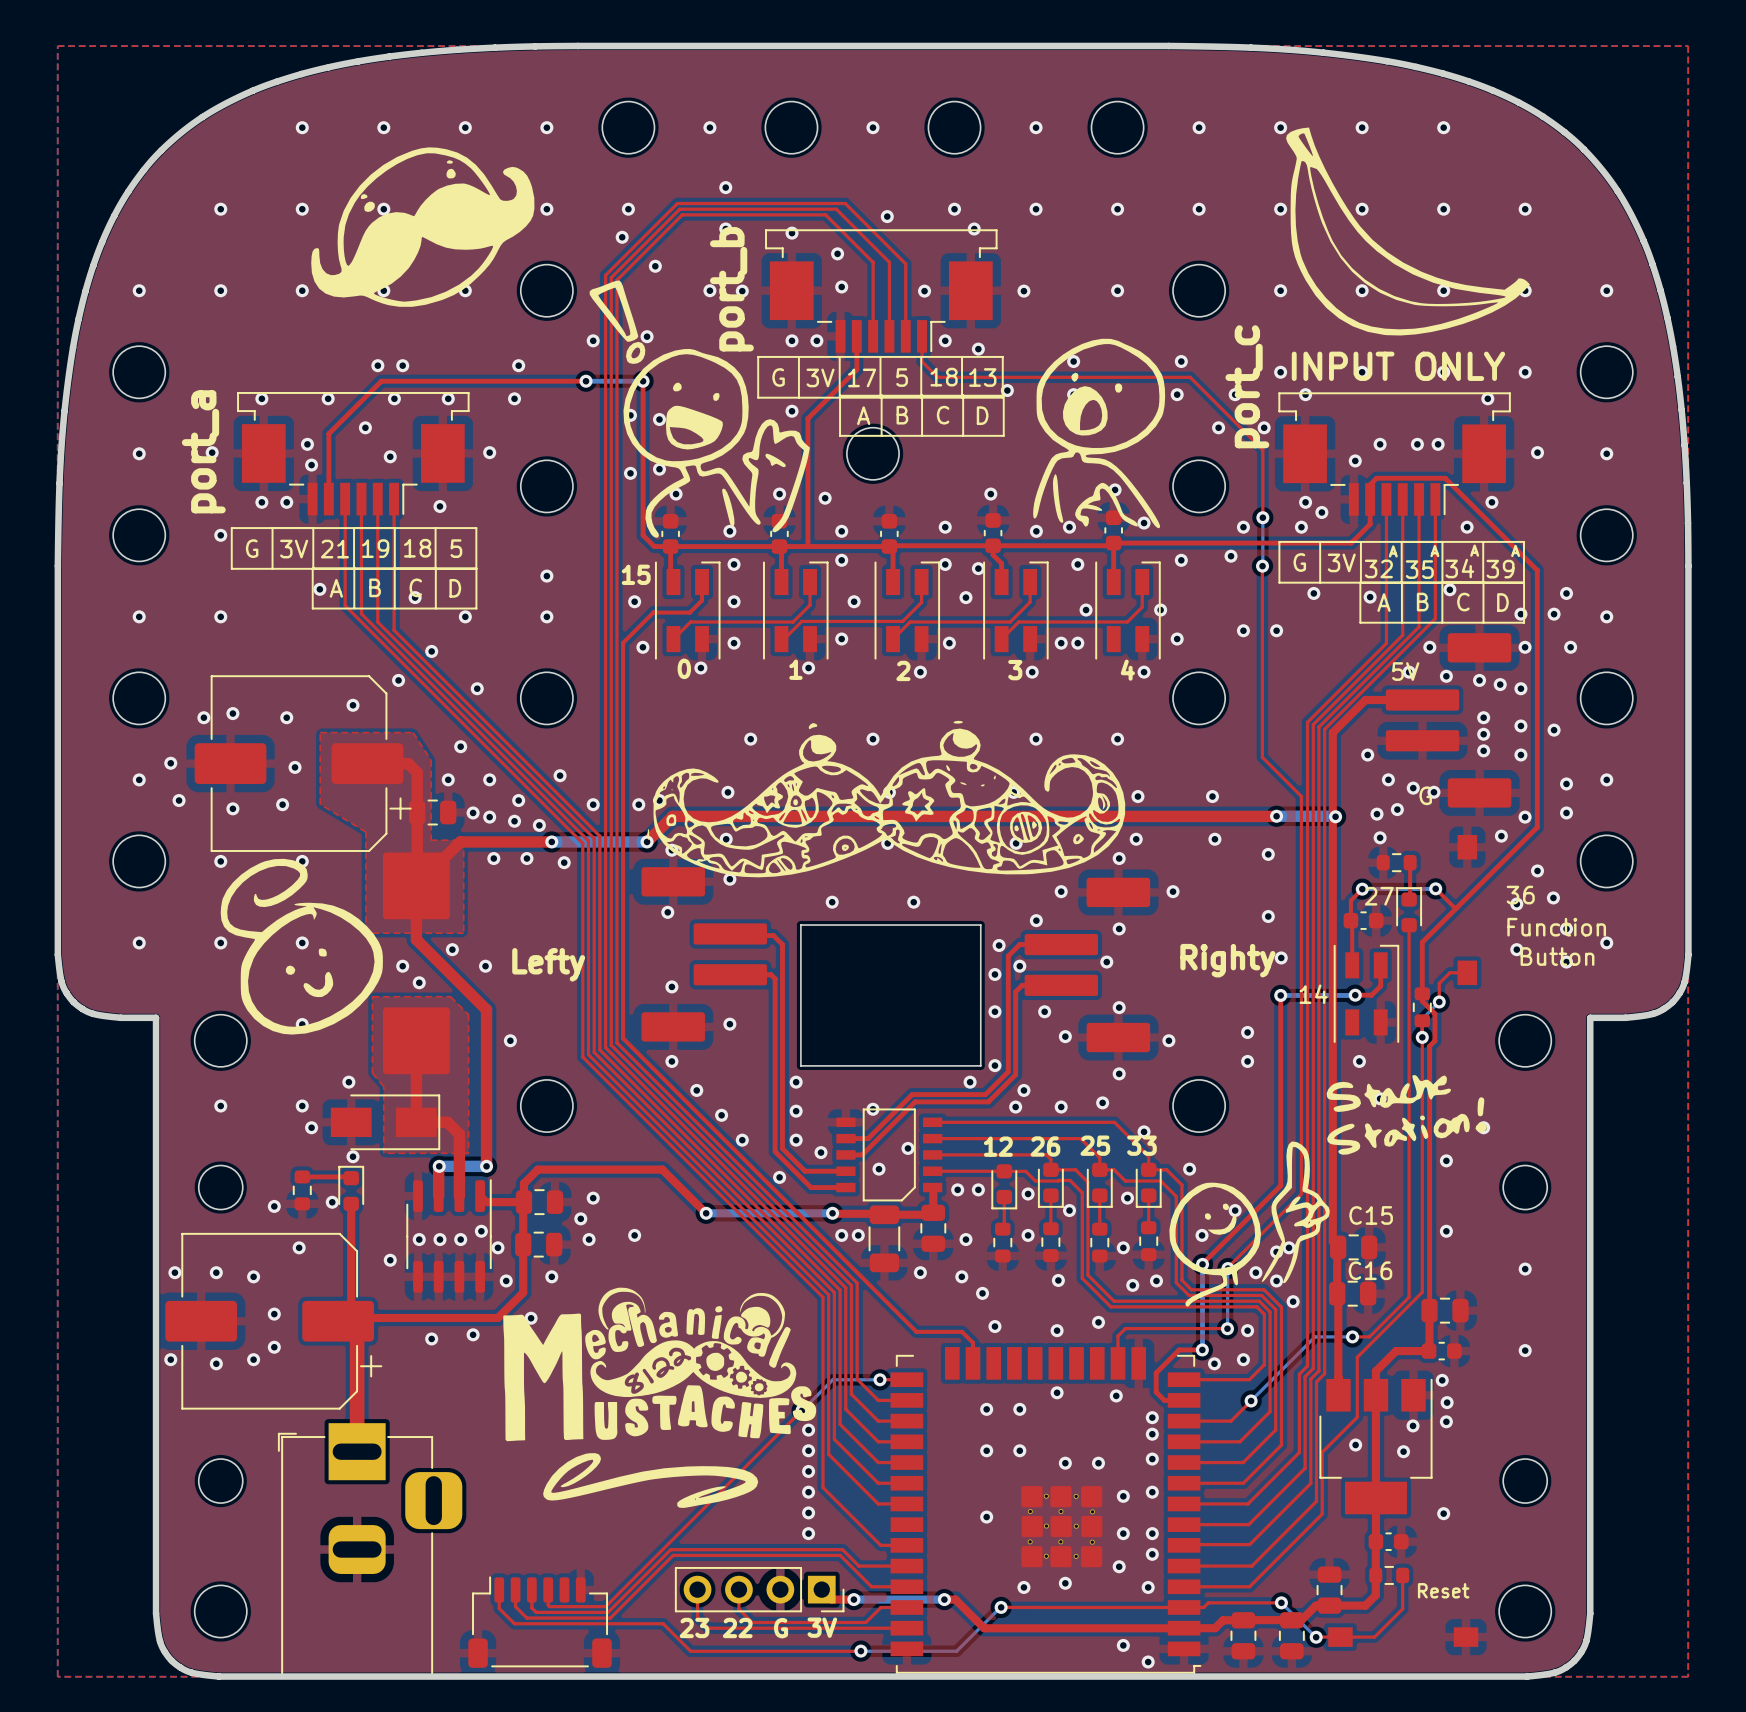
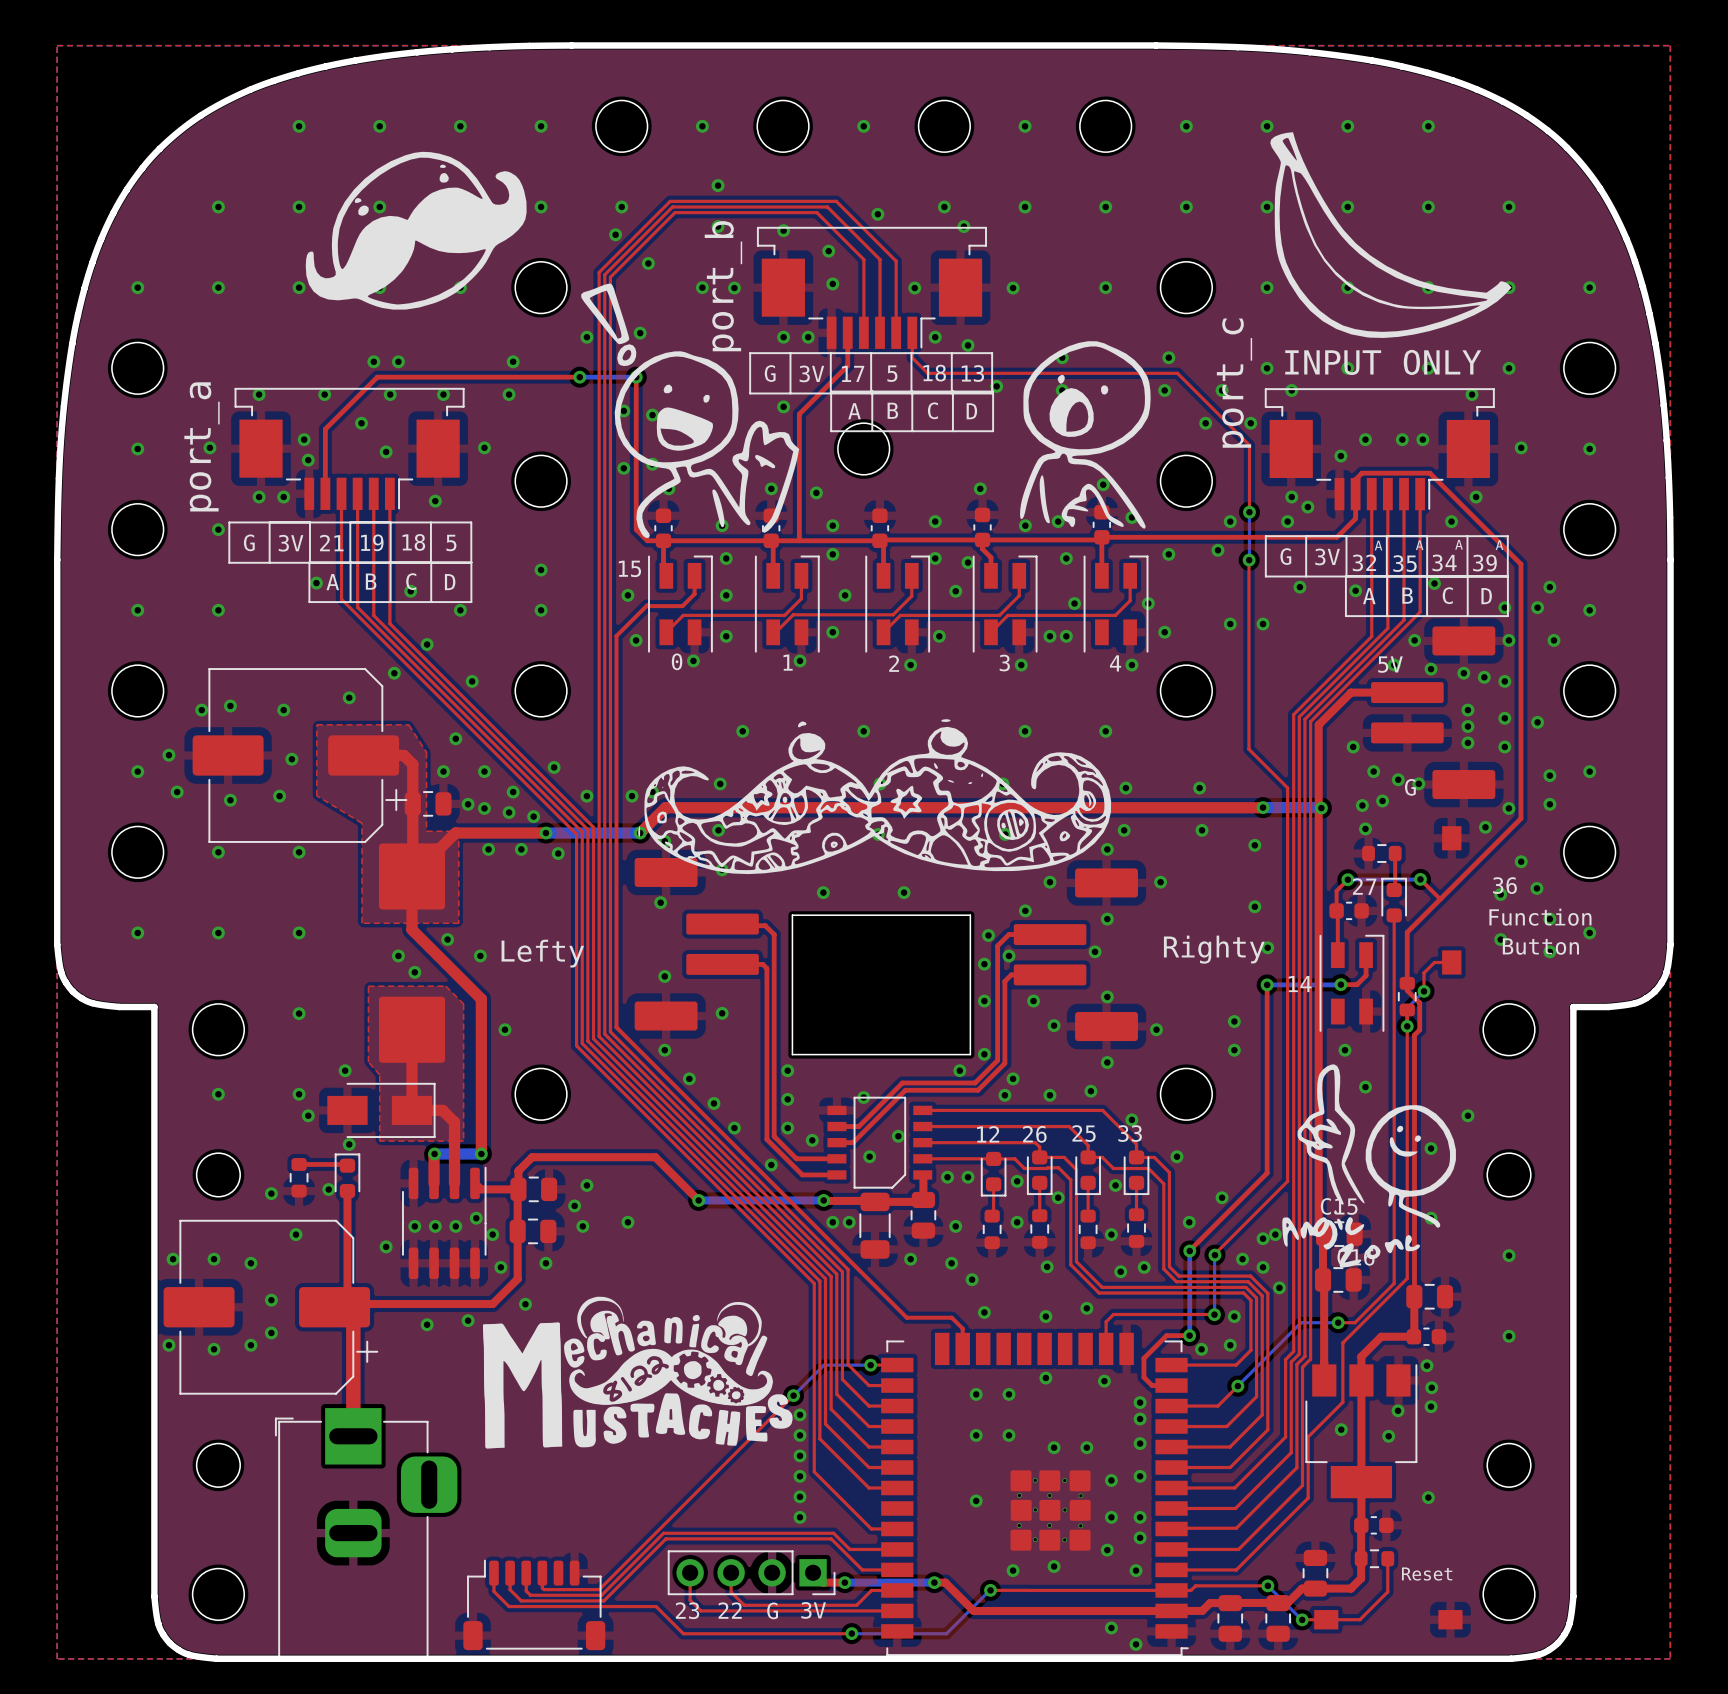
drawing shape: [311, 127, 1530, 1307] -> [305, 132, 1512, 1268]
drawing: [220, 858, 383, 1035] -> none
drawing: [1326, 1074, 1488, 1155] -> none
C15 name position: C15 (1371, 1215) -> C15 (1339, 1206)
drawing position: (659, 1364) -> (637, 1372)
drawing: [543, 1453, 759, 1508] -> none

